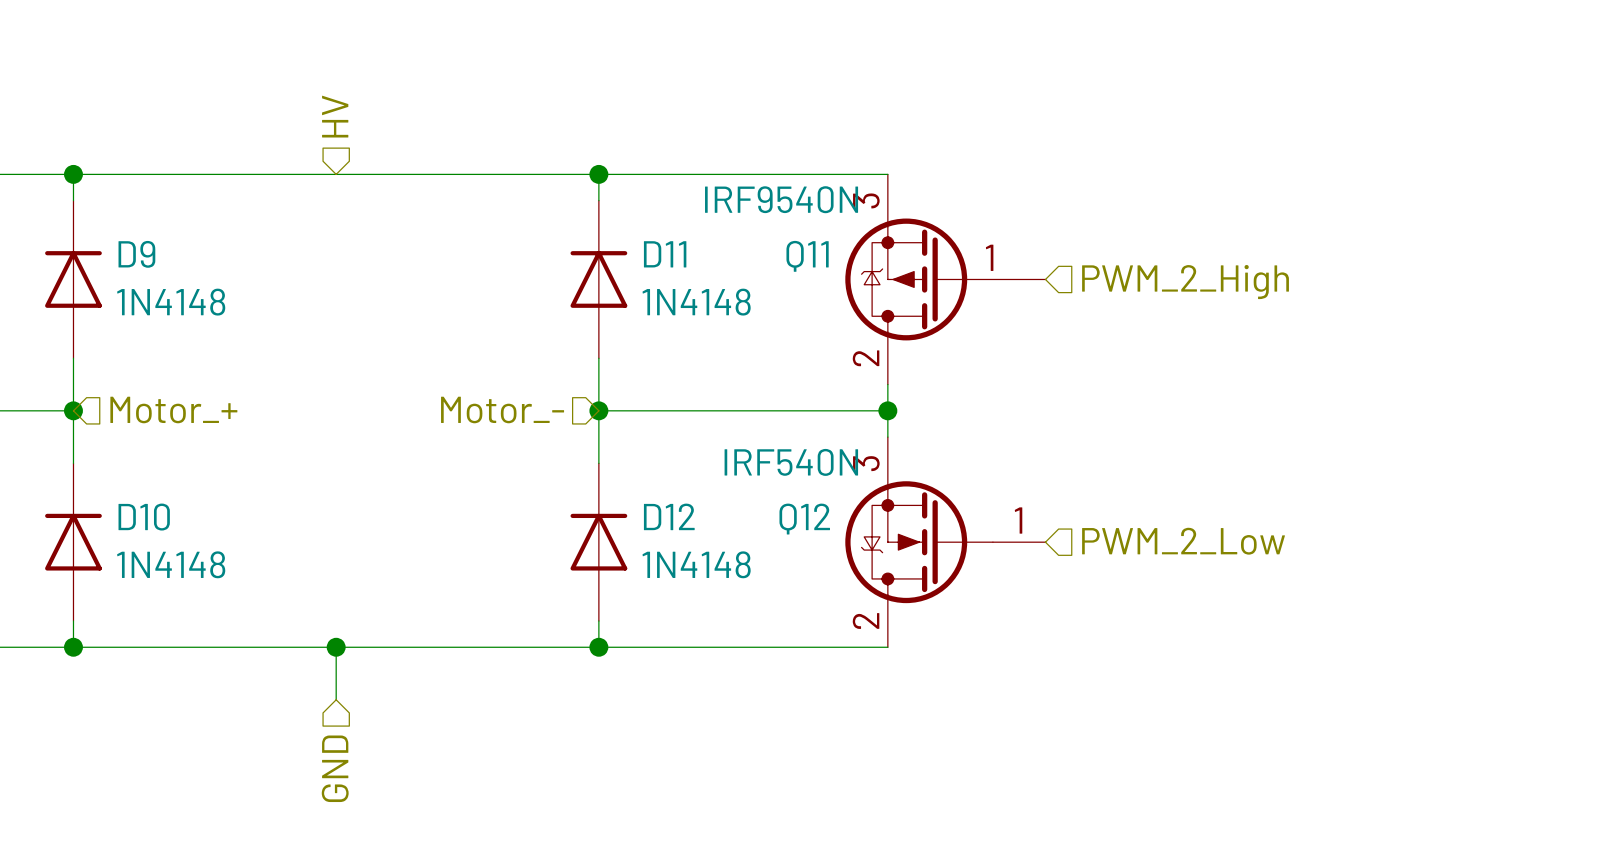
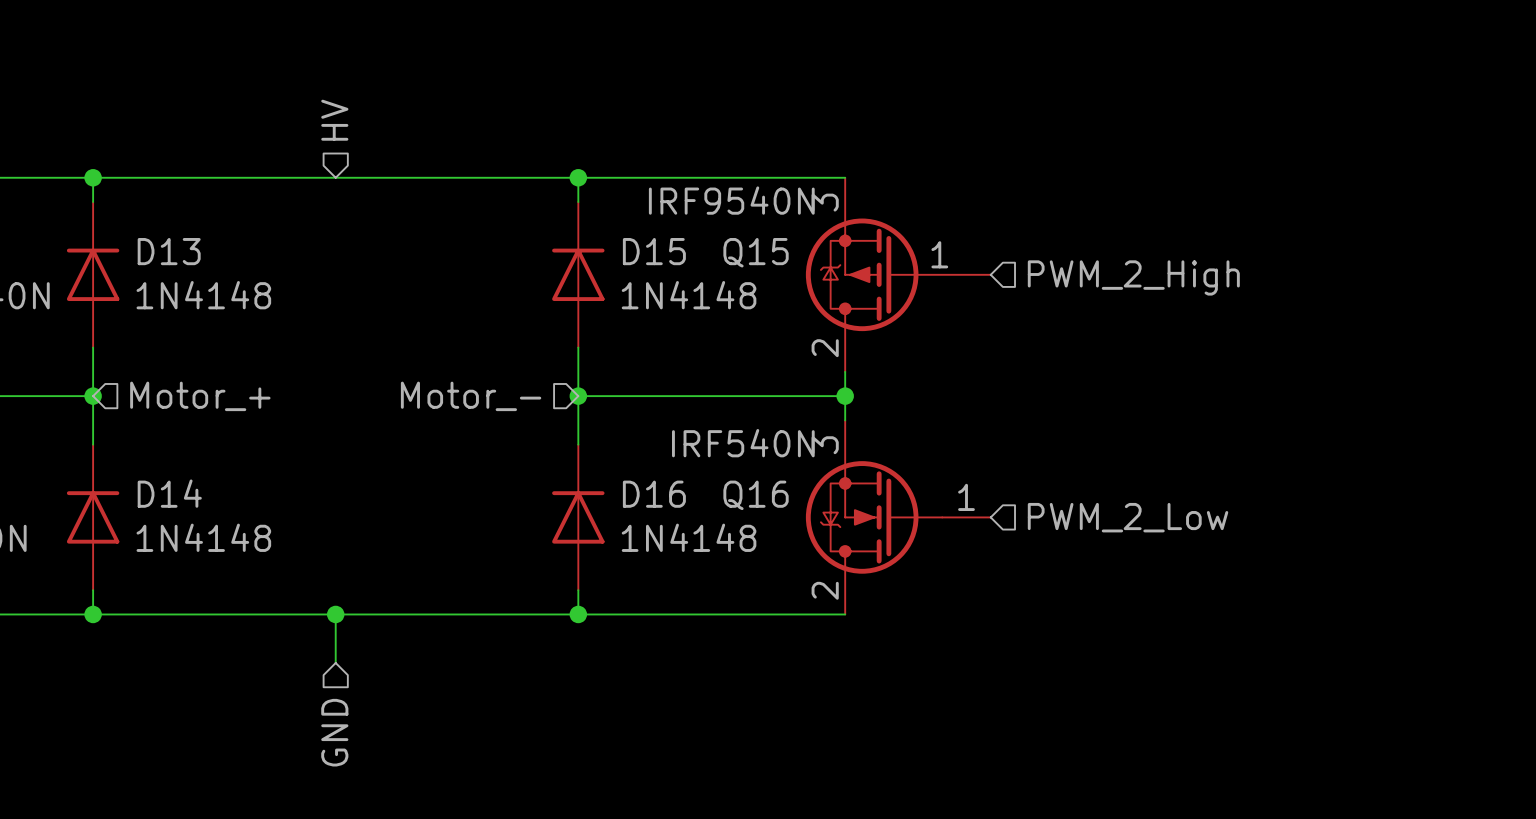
D9 name: D9 (136, 254) -> D13 (169, 251)
D11 name: D11 (665, 254) -> D15 (654, 251)
Q11 name: Q11 (807, 256) -> Q15 (756, 252)
D12 name: D12 (669, 516) -> D16 (654, 494)
D10 name: D10 (144, 517) -> D14 (169, 493)
Q12 name: Q12 (804, 519) -> Q16 (756, 495)

